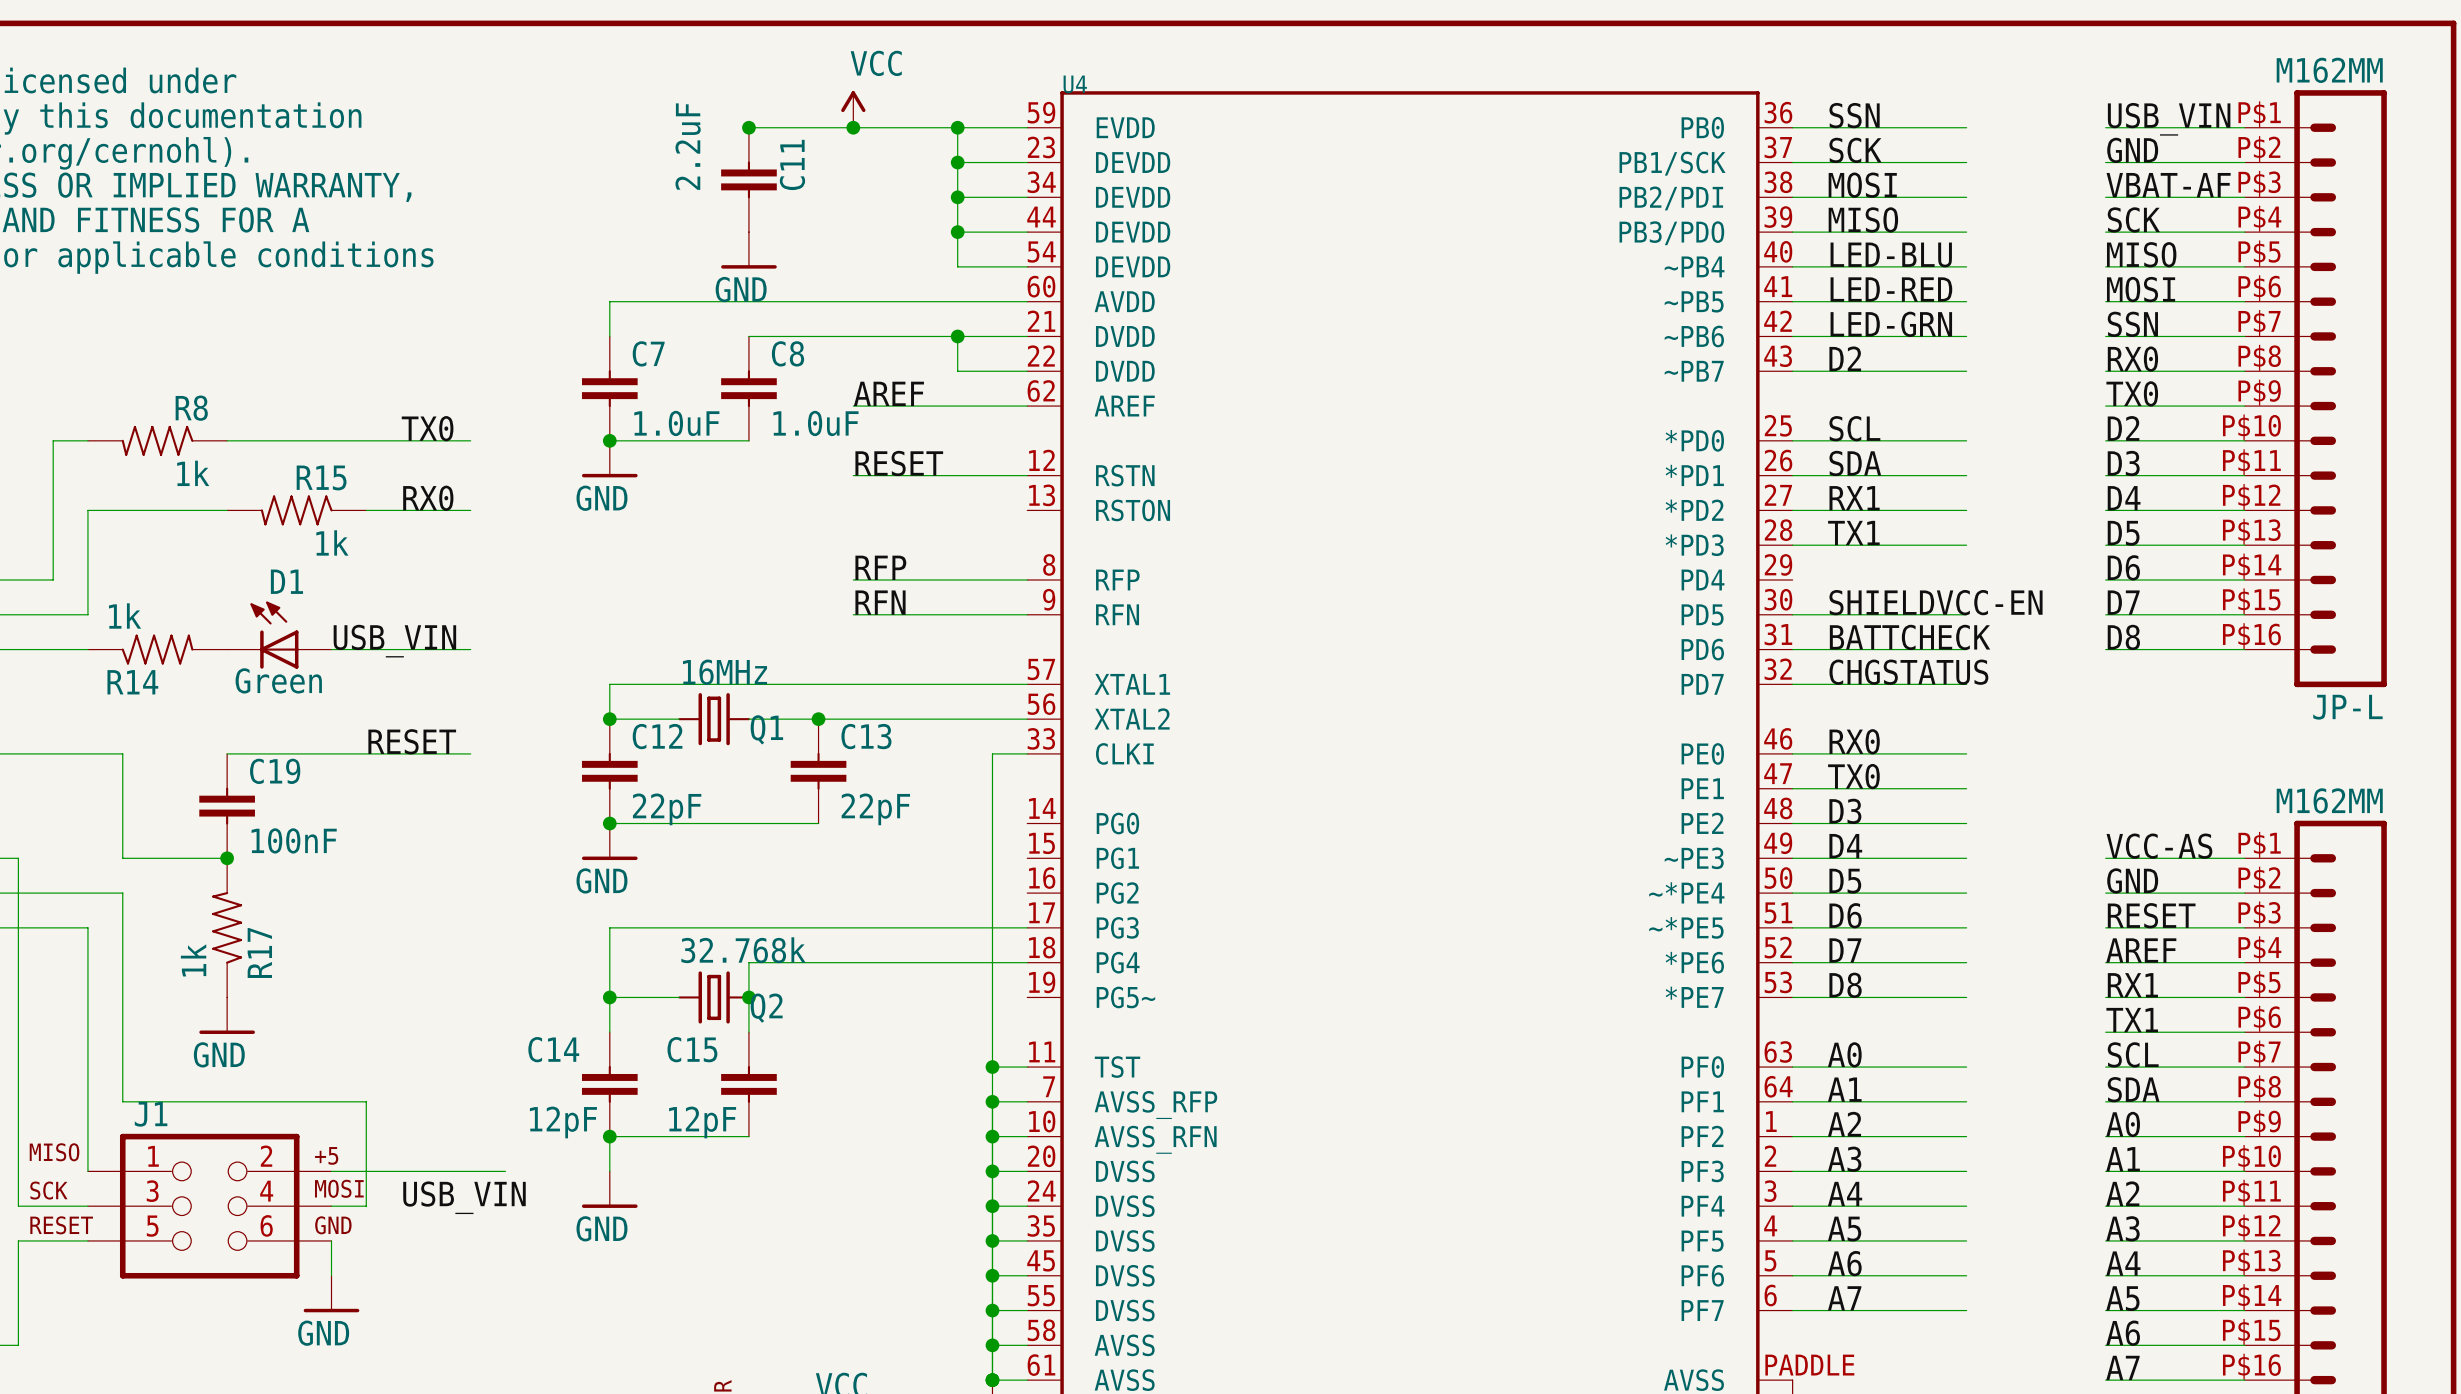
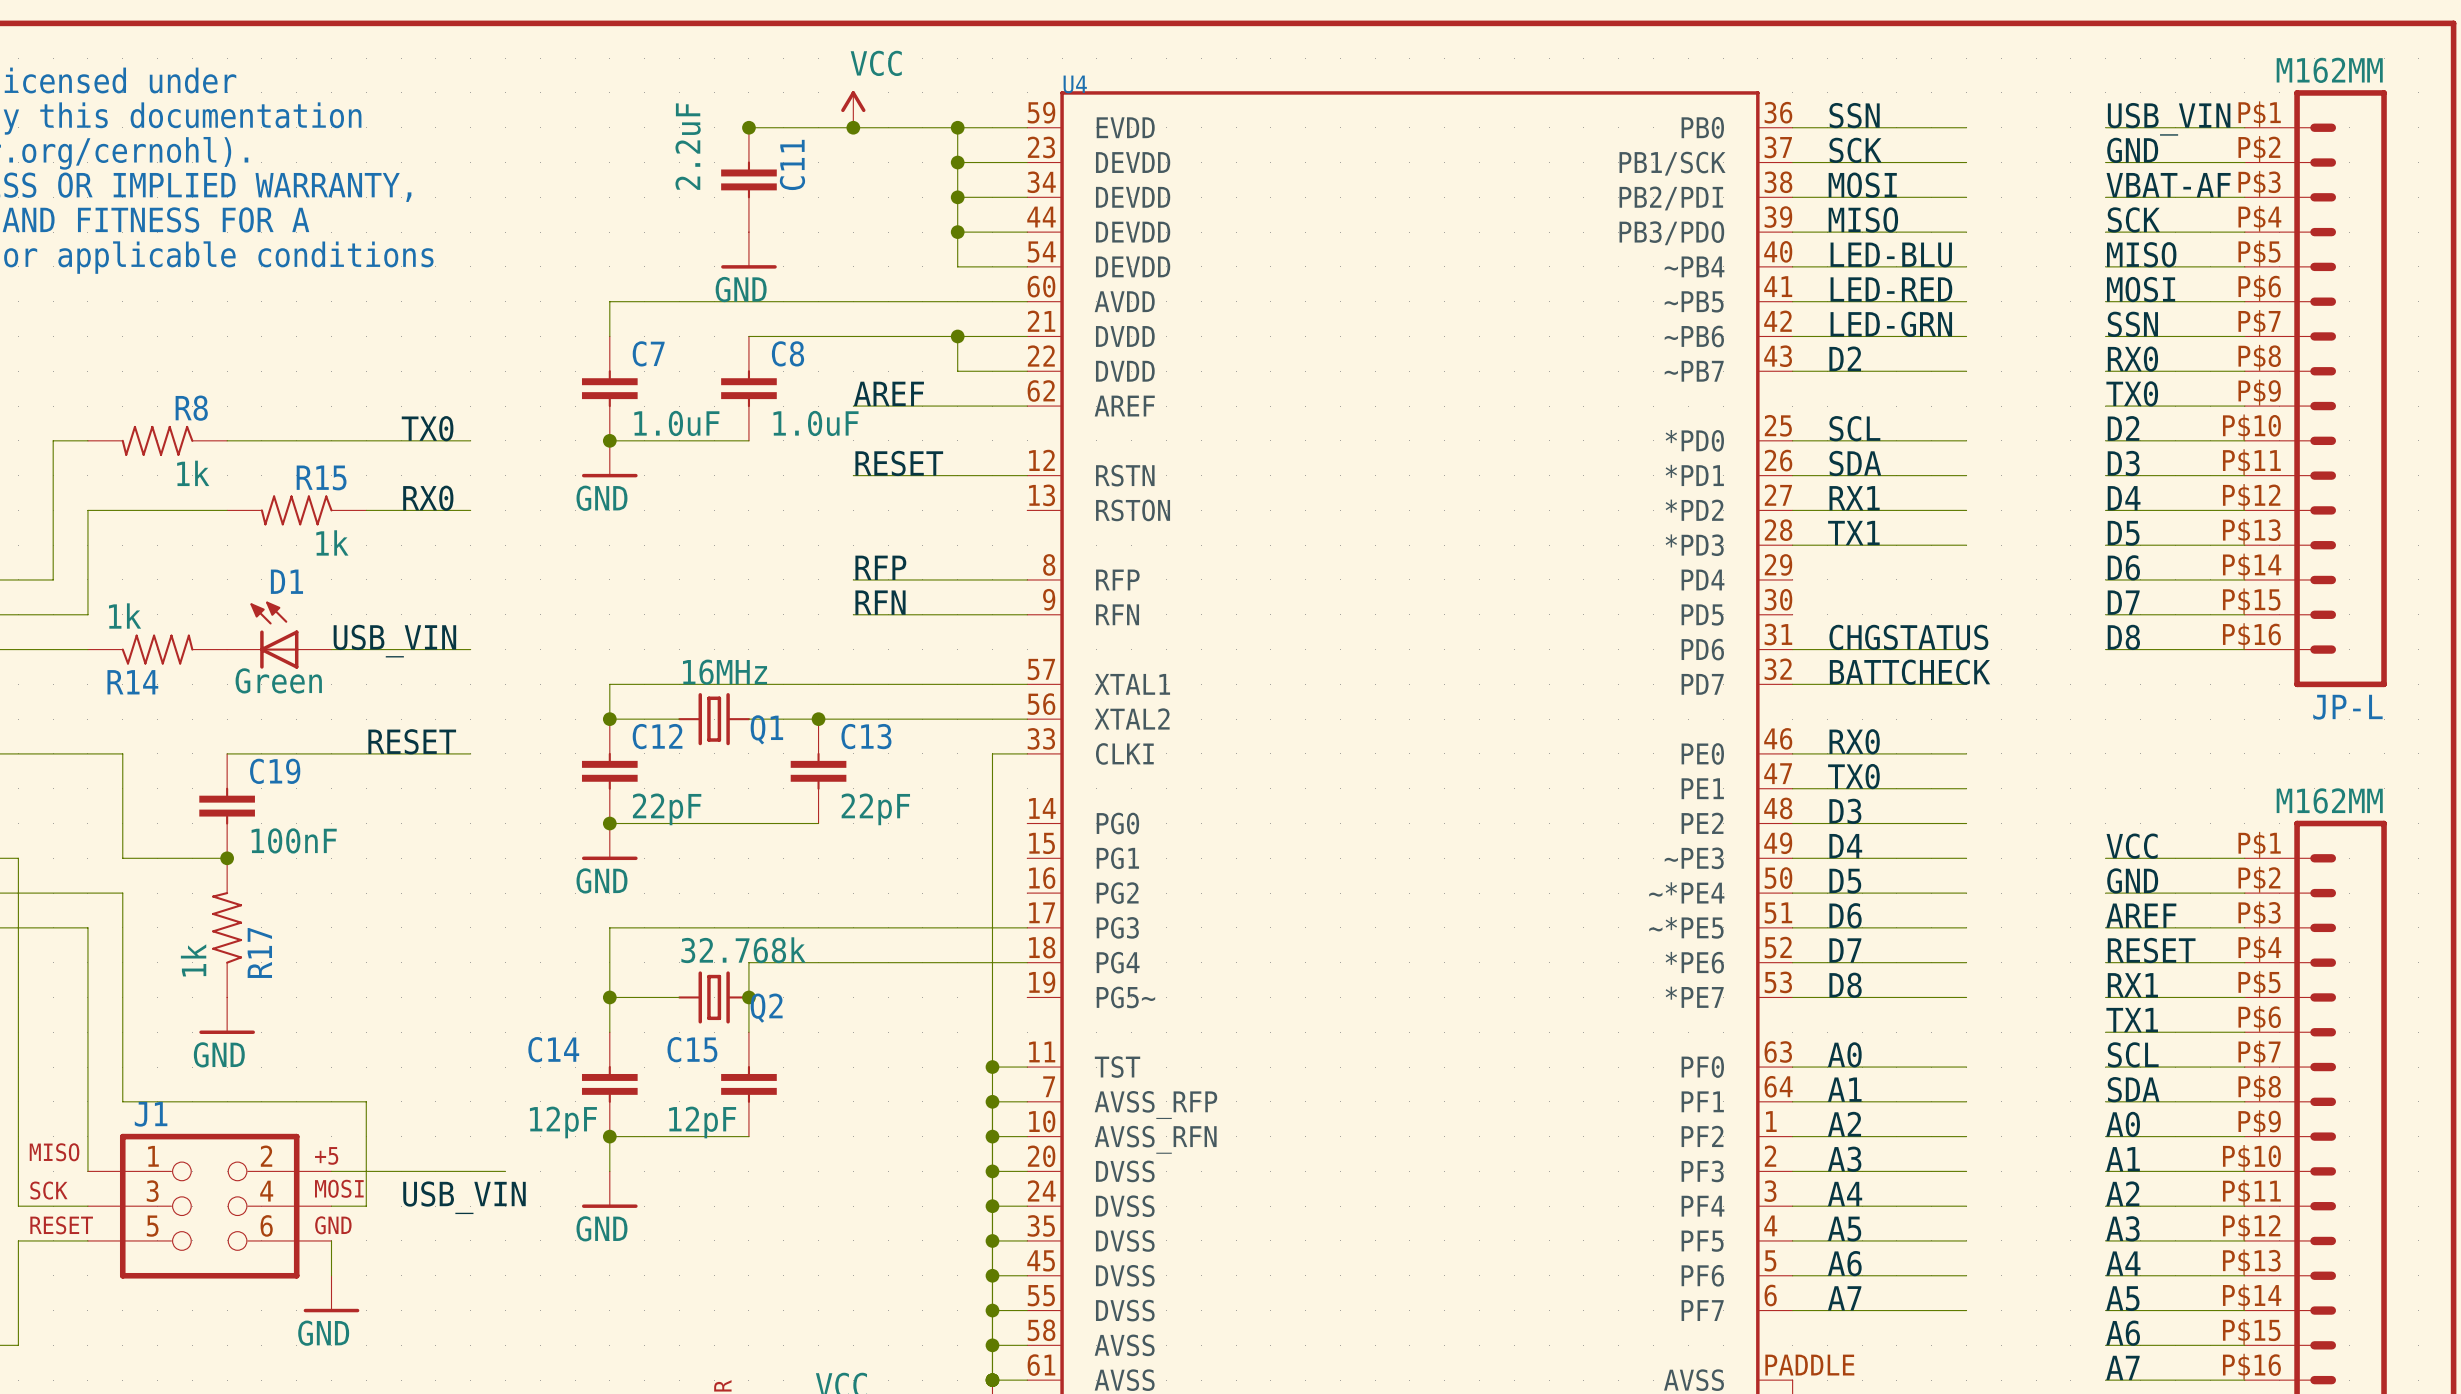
label: SHIELDVCC-EN (1936, 602) -> none
wire: (1792, 614) (1966, 614) -> none
label: BATTCHECK (1910, 637) -> CHGSTATUS (1908, 637)
label: CHGSTATUS (1908, 672) -> BATTCHECK (1910, 672)
label: VCC-AS (2159, 846) -> VCC (2132, 846)
label: RESET (2151, 915) -> AREF (2141, 915)
label: AREF (2141, 950) -> RESET (2151, 950)

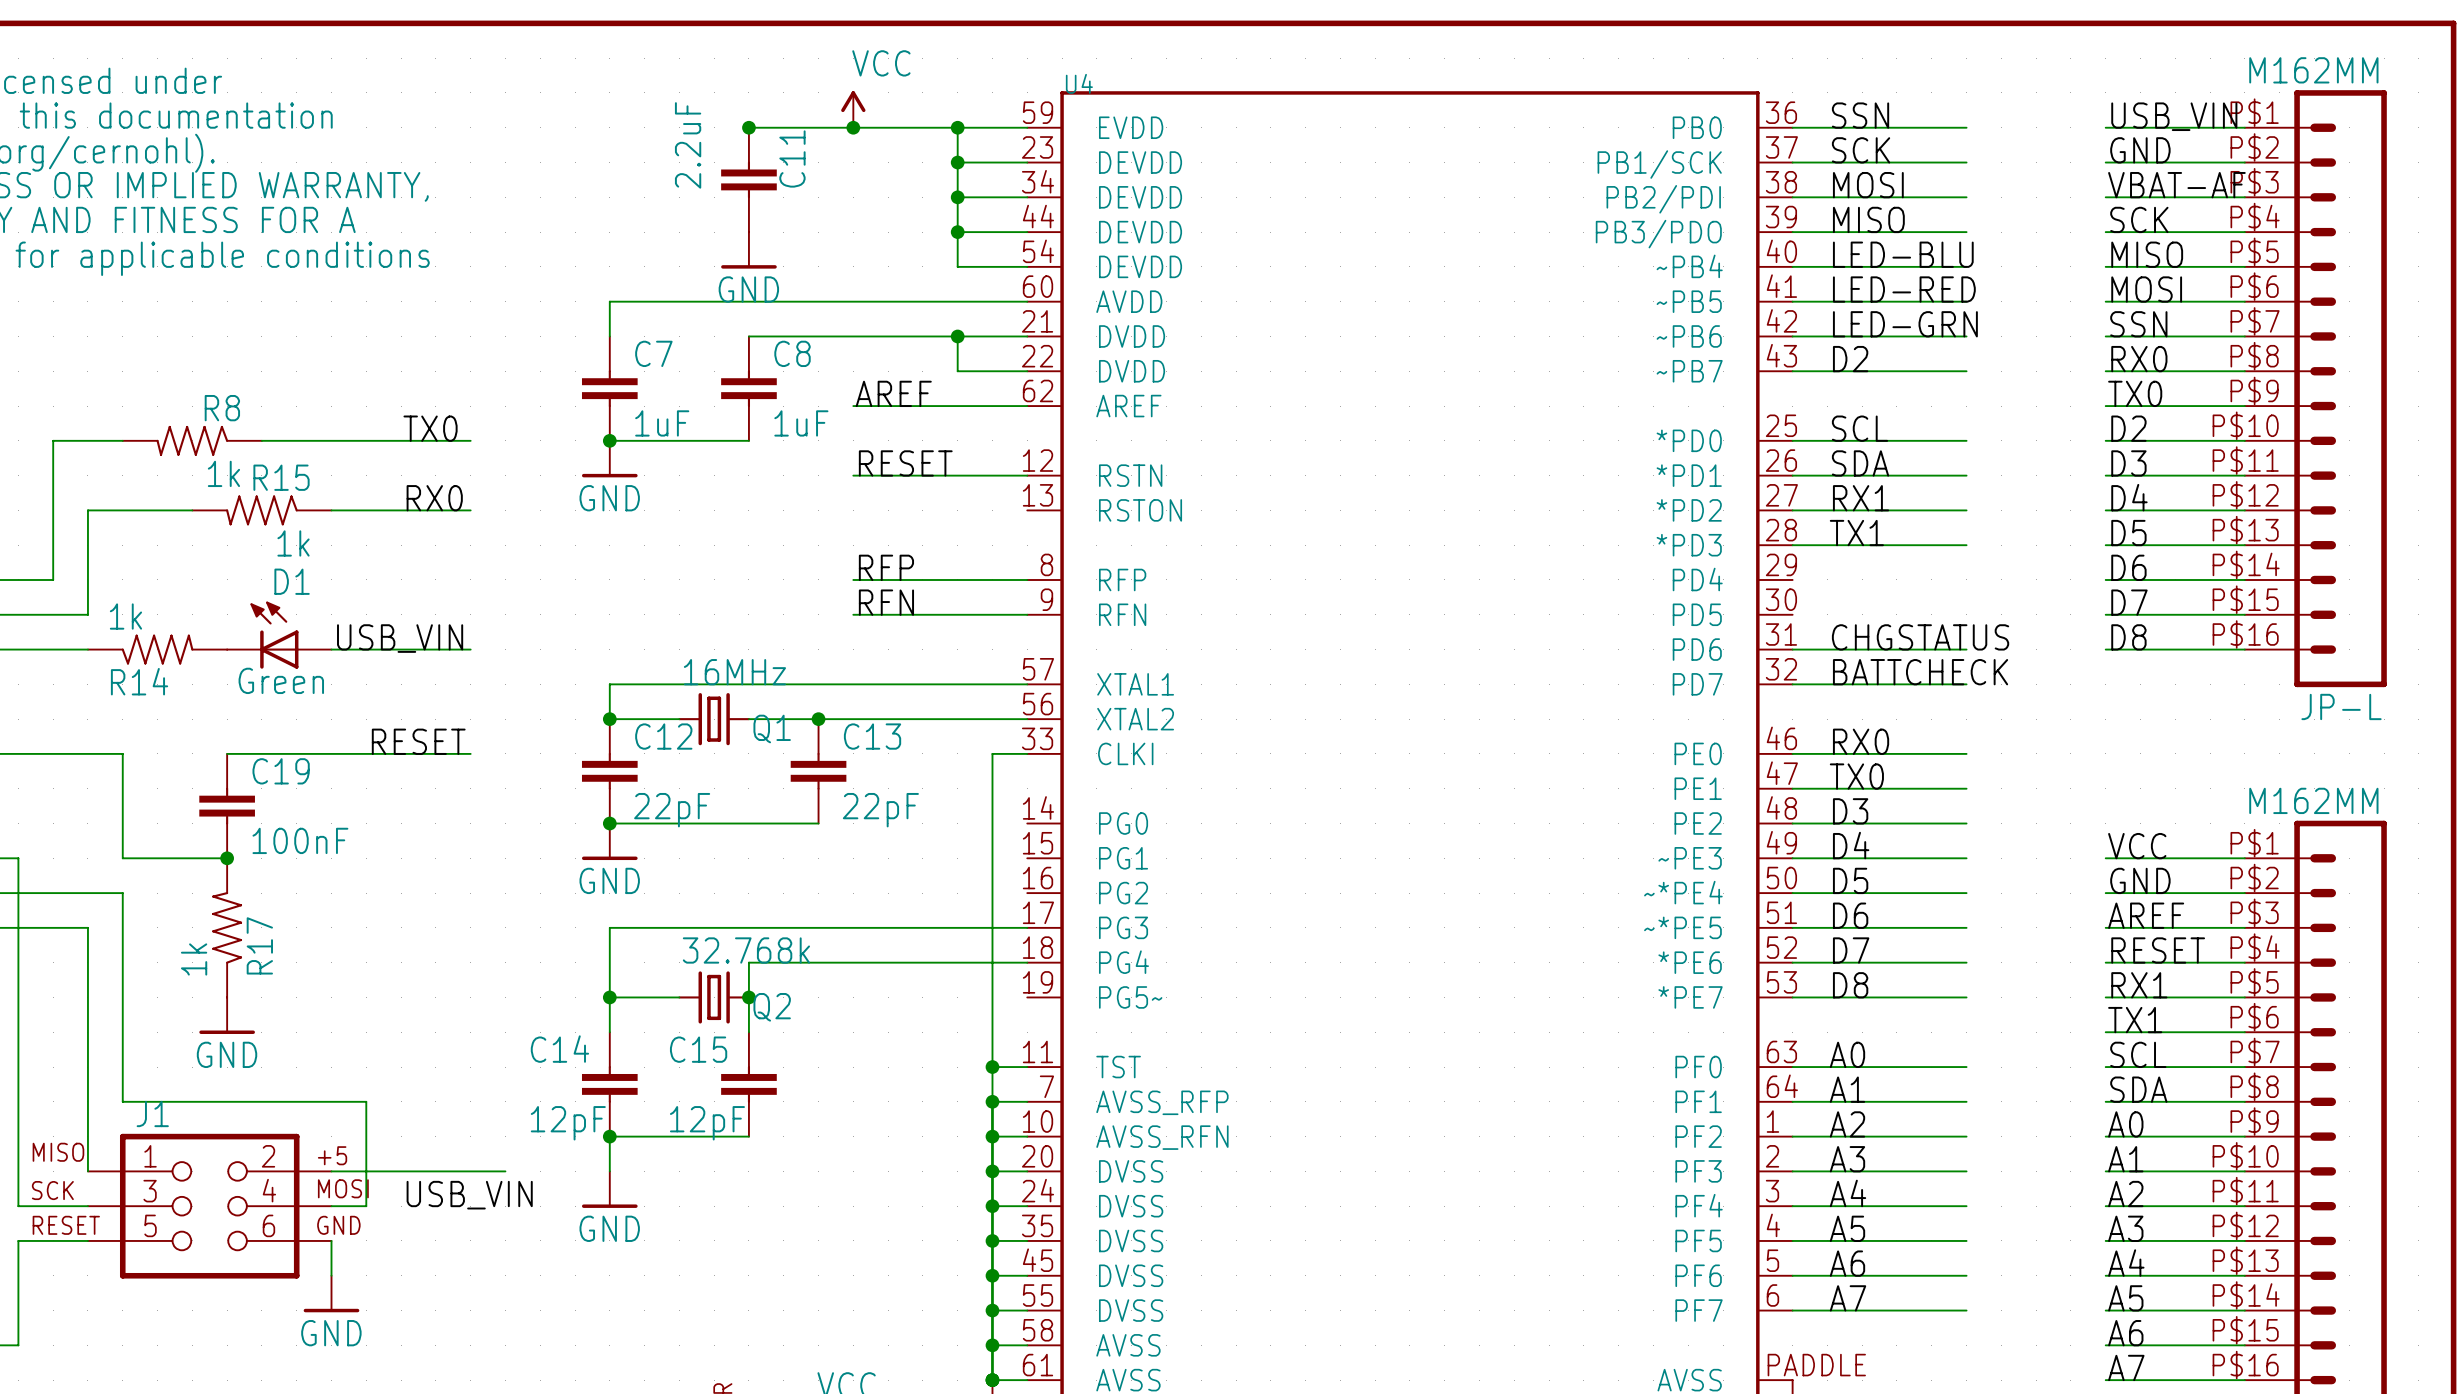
C7 value: 1.0uF (676, 423) -> 1uF (662, 423)
C8 value: 1.0uF (816, 423) -> 1uF (801, 423)
R8 position: (157, 440) -> (192, 440)
R15 position: (296, 510) -> (261, 510)

